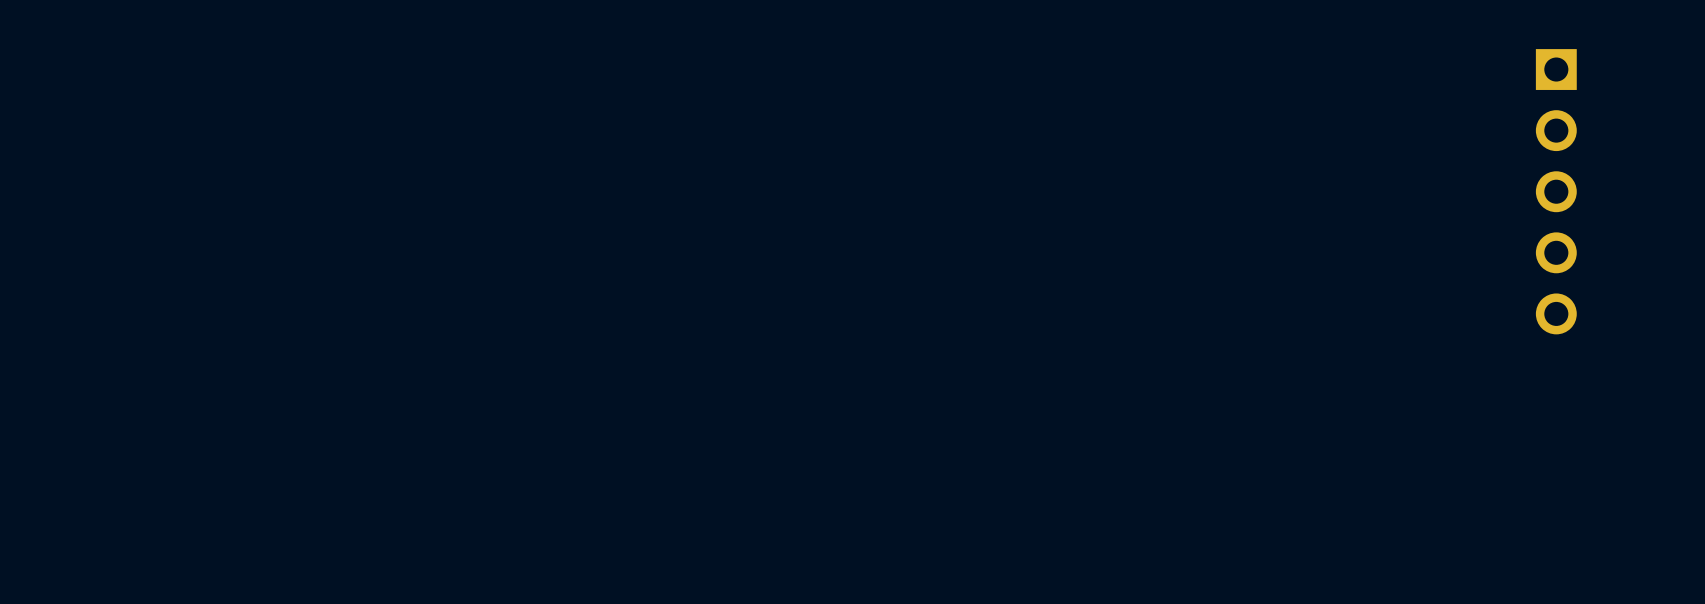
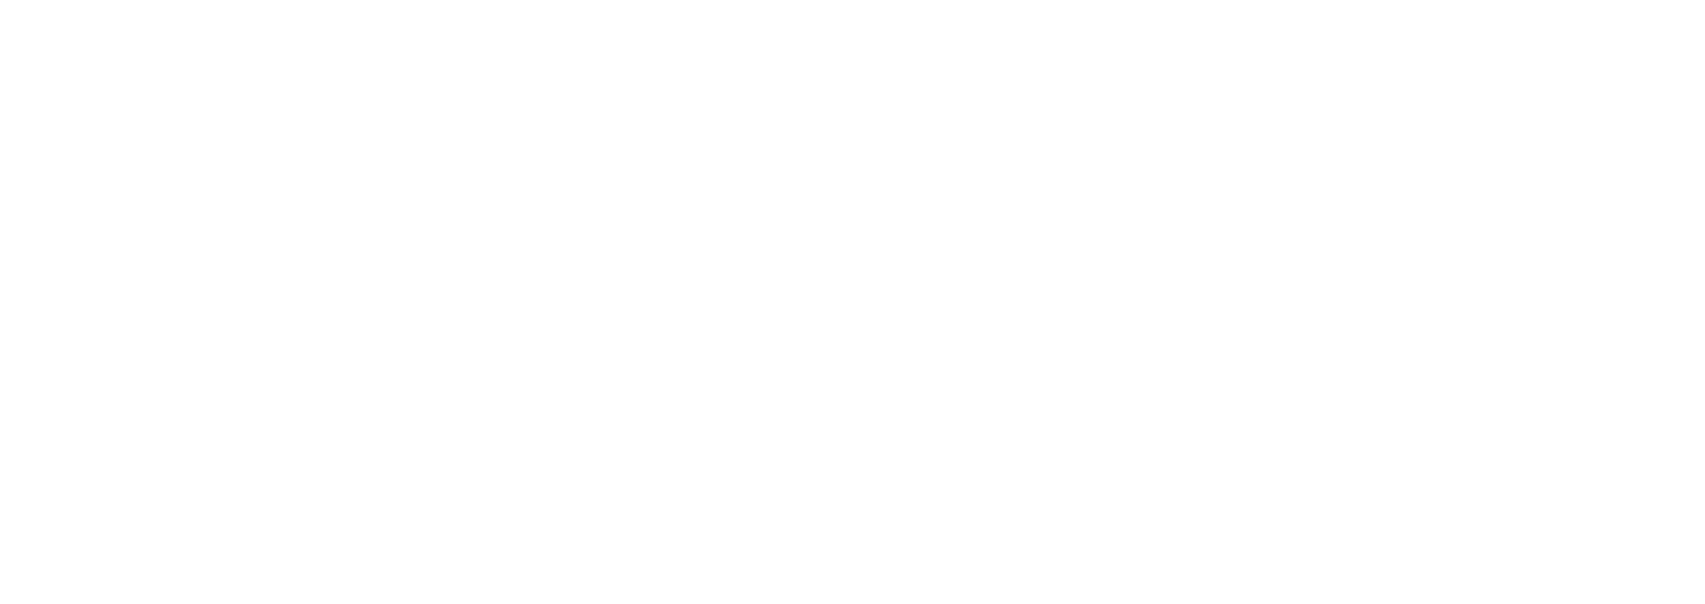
part: (1556, 191) -> none

